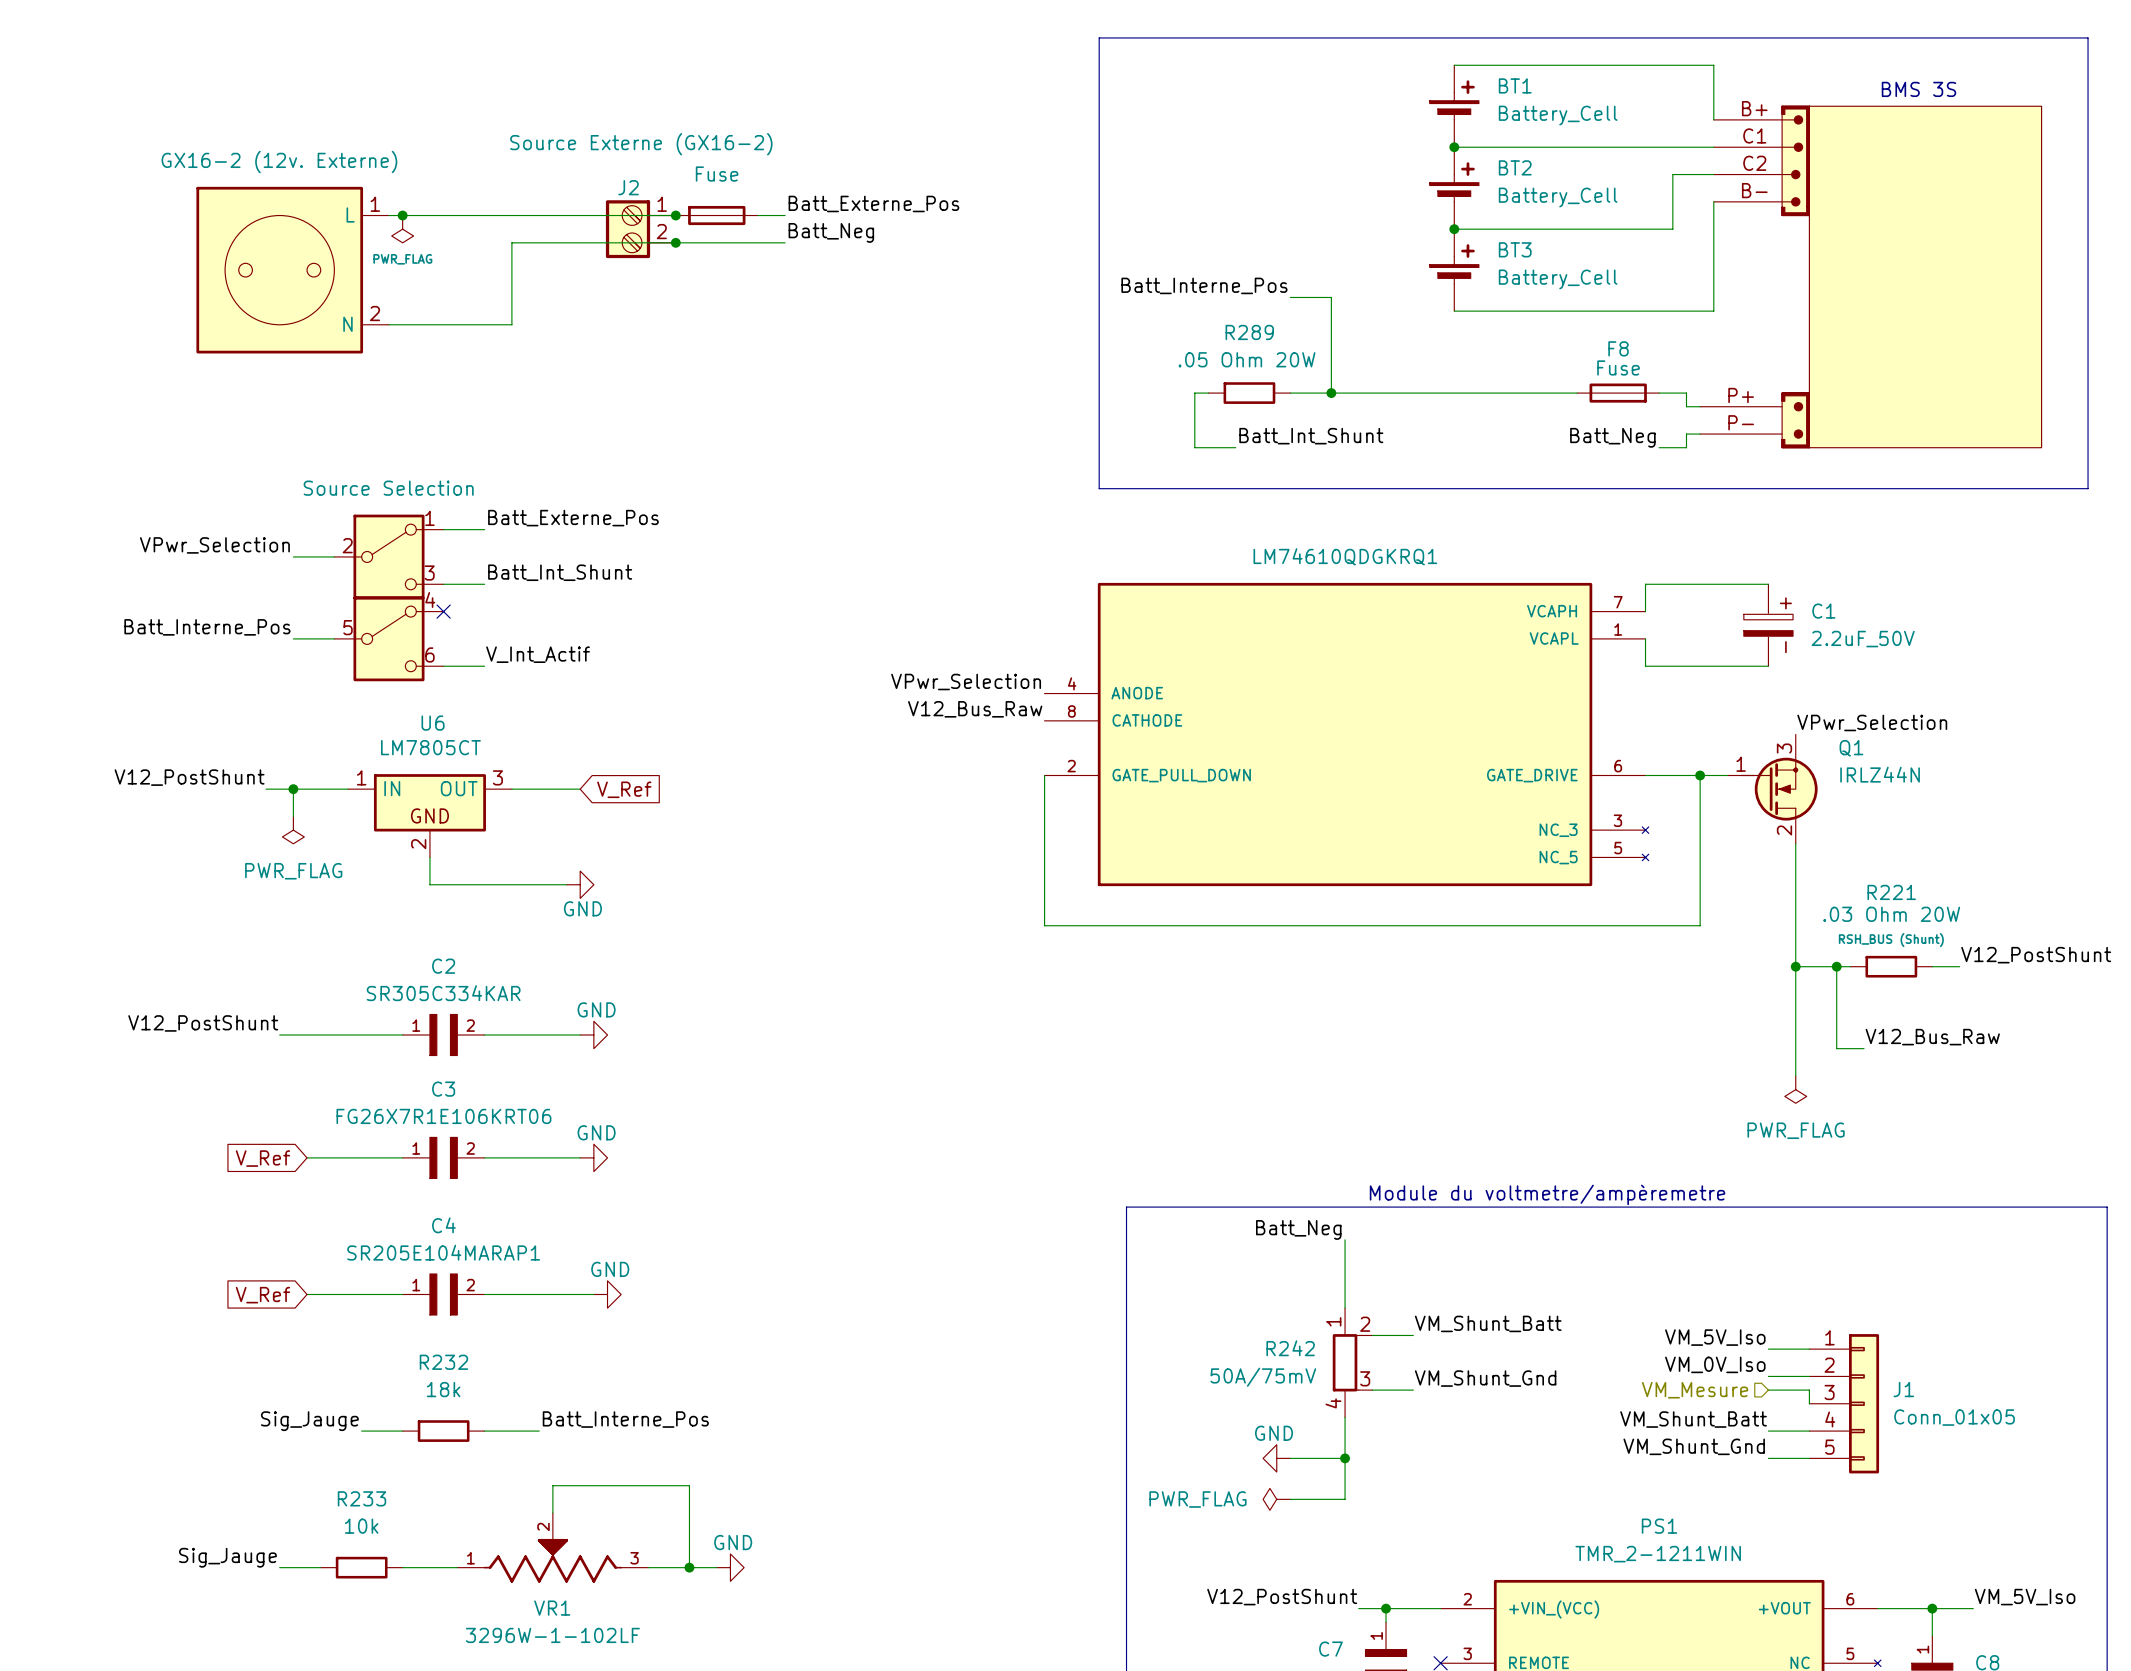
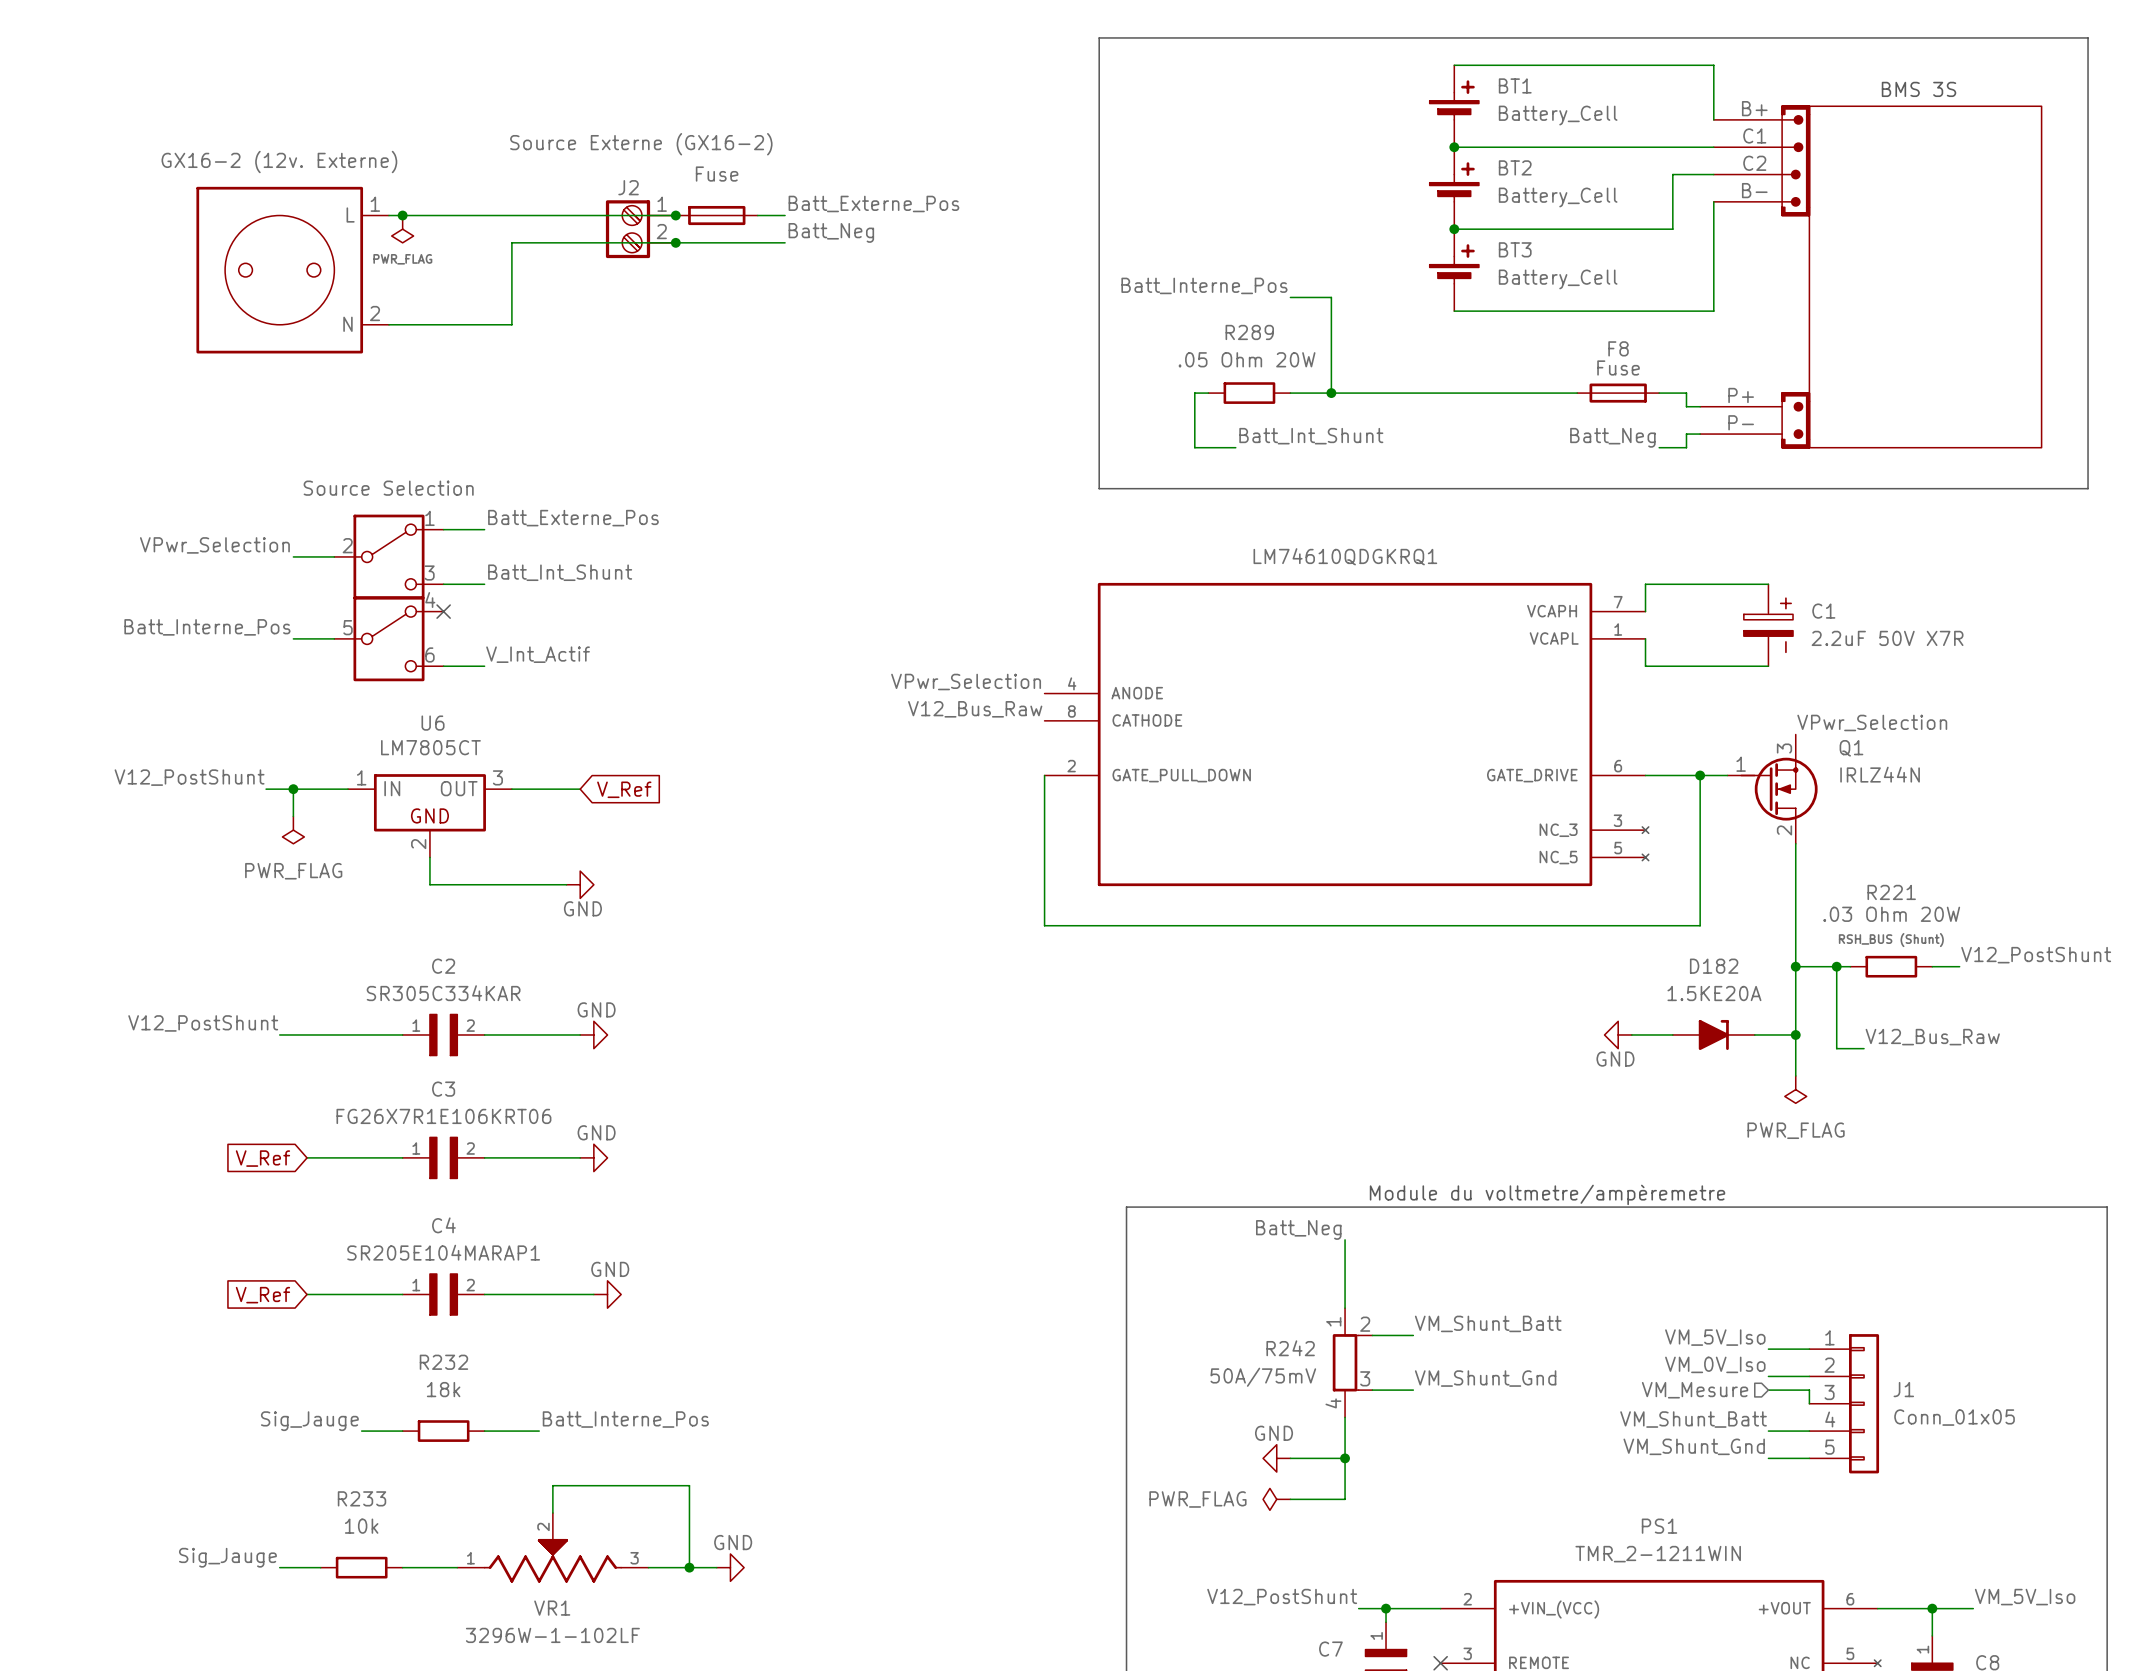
C1 value: 2.2uF_50V (1863, 639) -> 2.2uF 50V X7R (1887, 638)
power symbol: none -> GND (1618, 1034)
wire: none -> (1631, 1034) (1672, 1034)
D182: none -> 1.5KE20A (1713, 1034)
wire: none -> (1754, 1034) (1795, 1034)
junction: none -> (1795, 1034)

